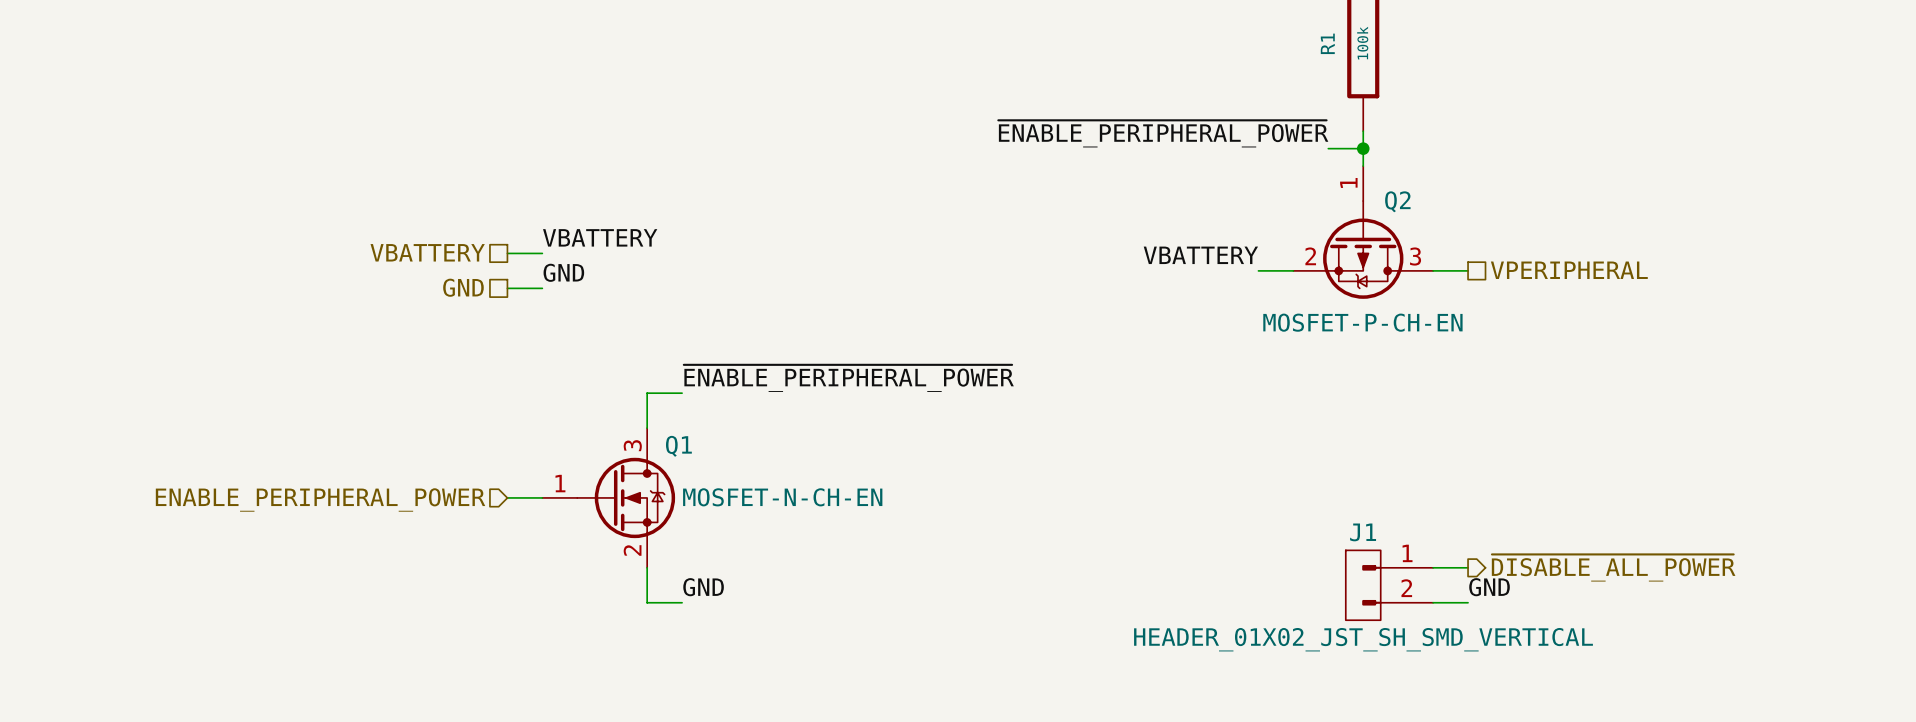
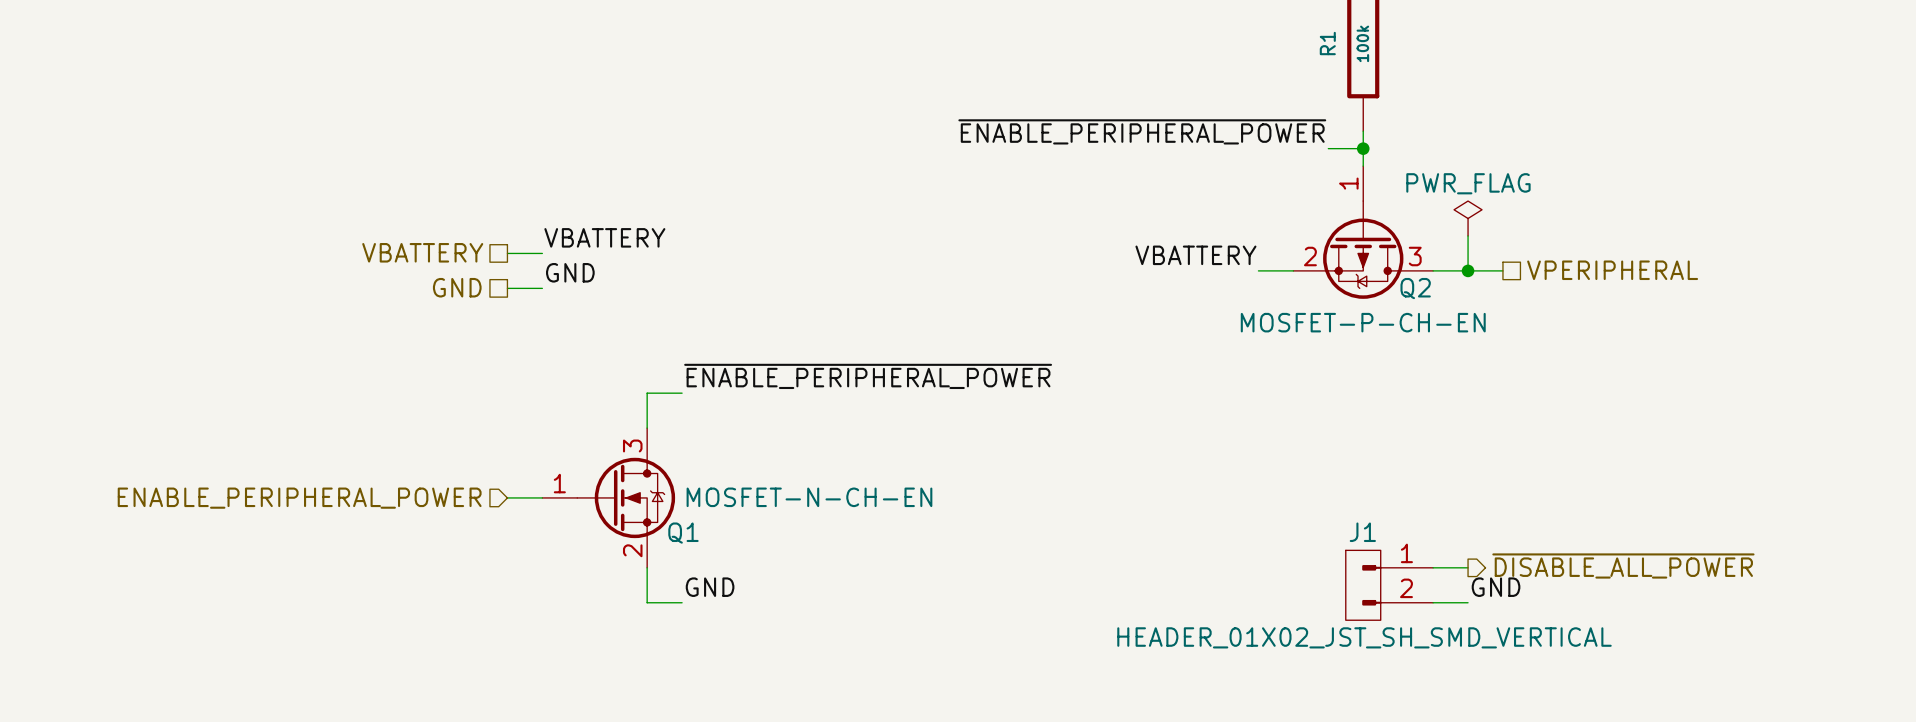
Q2 name position: Q2 (1397, 201) -> Q2 (1415, 288)
power symbol: none -> PWR_FLAG (1468, 218)
wire: none -> (1468, 235) (1468, 270) (1502, 270)
junction: none -> (1468, 270)
hierarchical label position: VPERIPHERAL (1569, 270) -> VPERIPHERAL (1612, 270)
Q1 name position: Q1 (678, 446) -> Q1 (683, 533)

